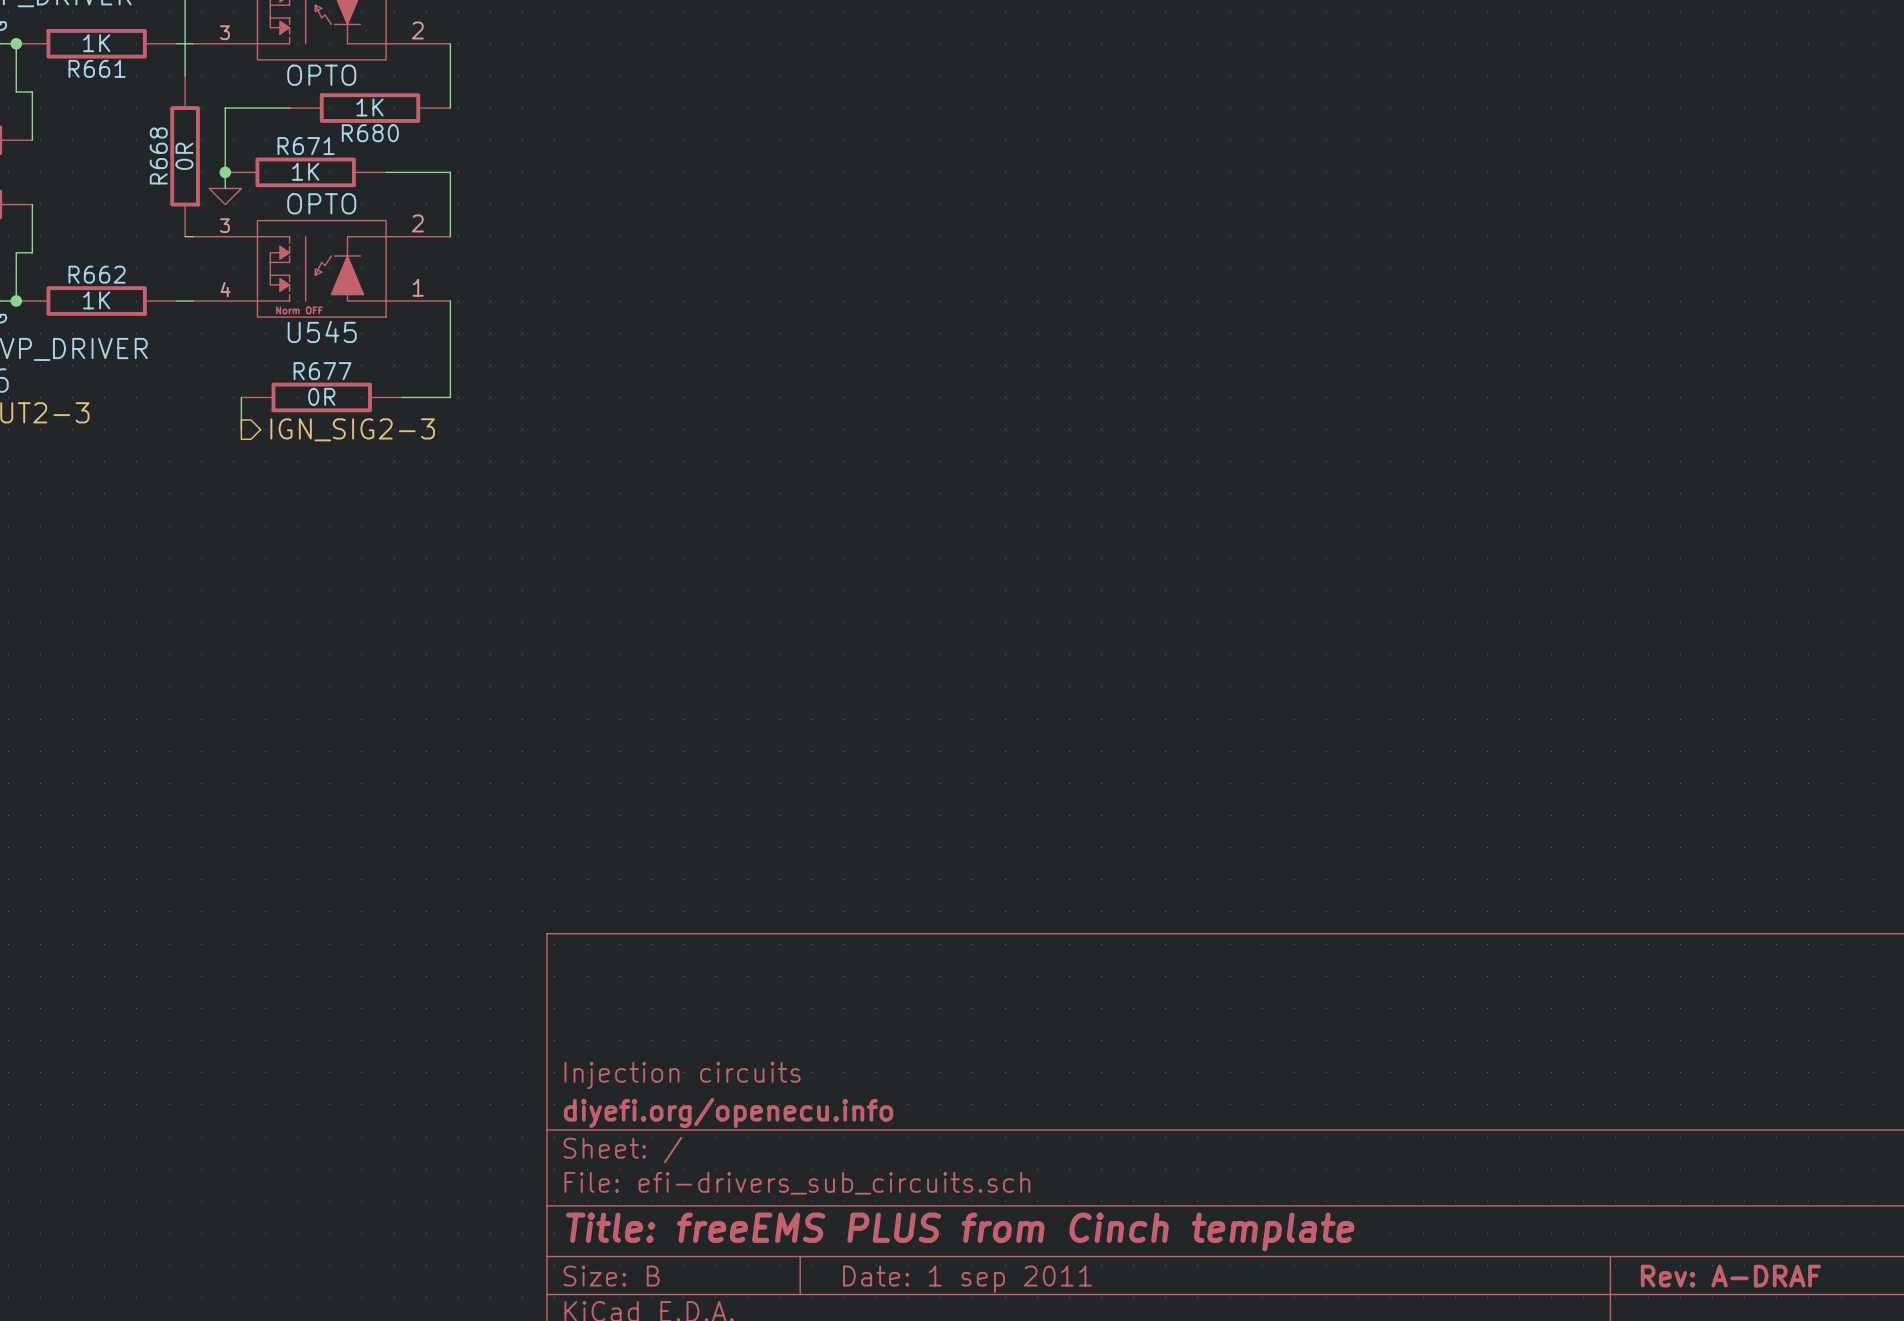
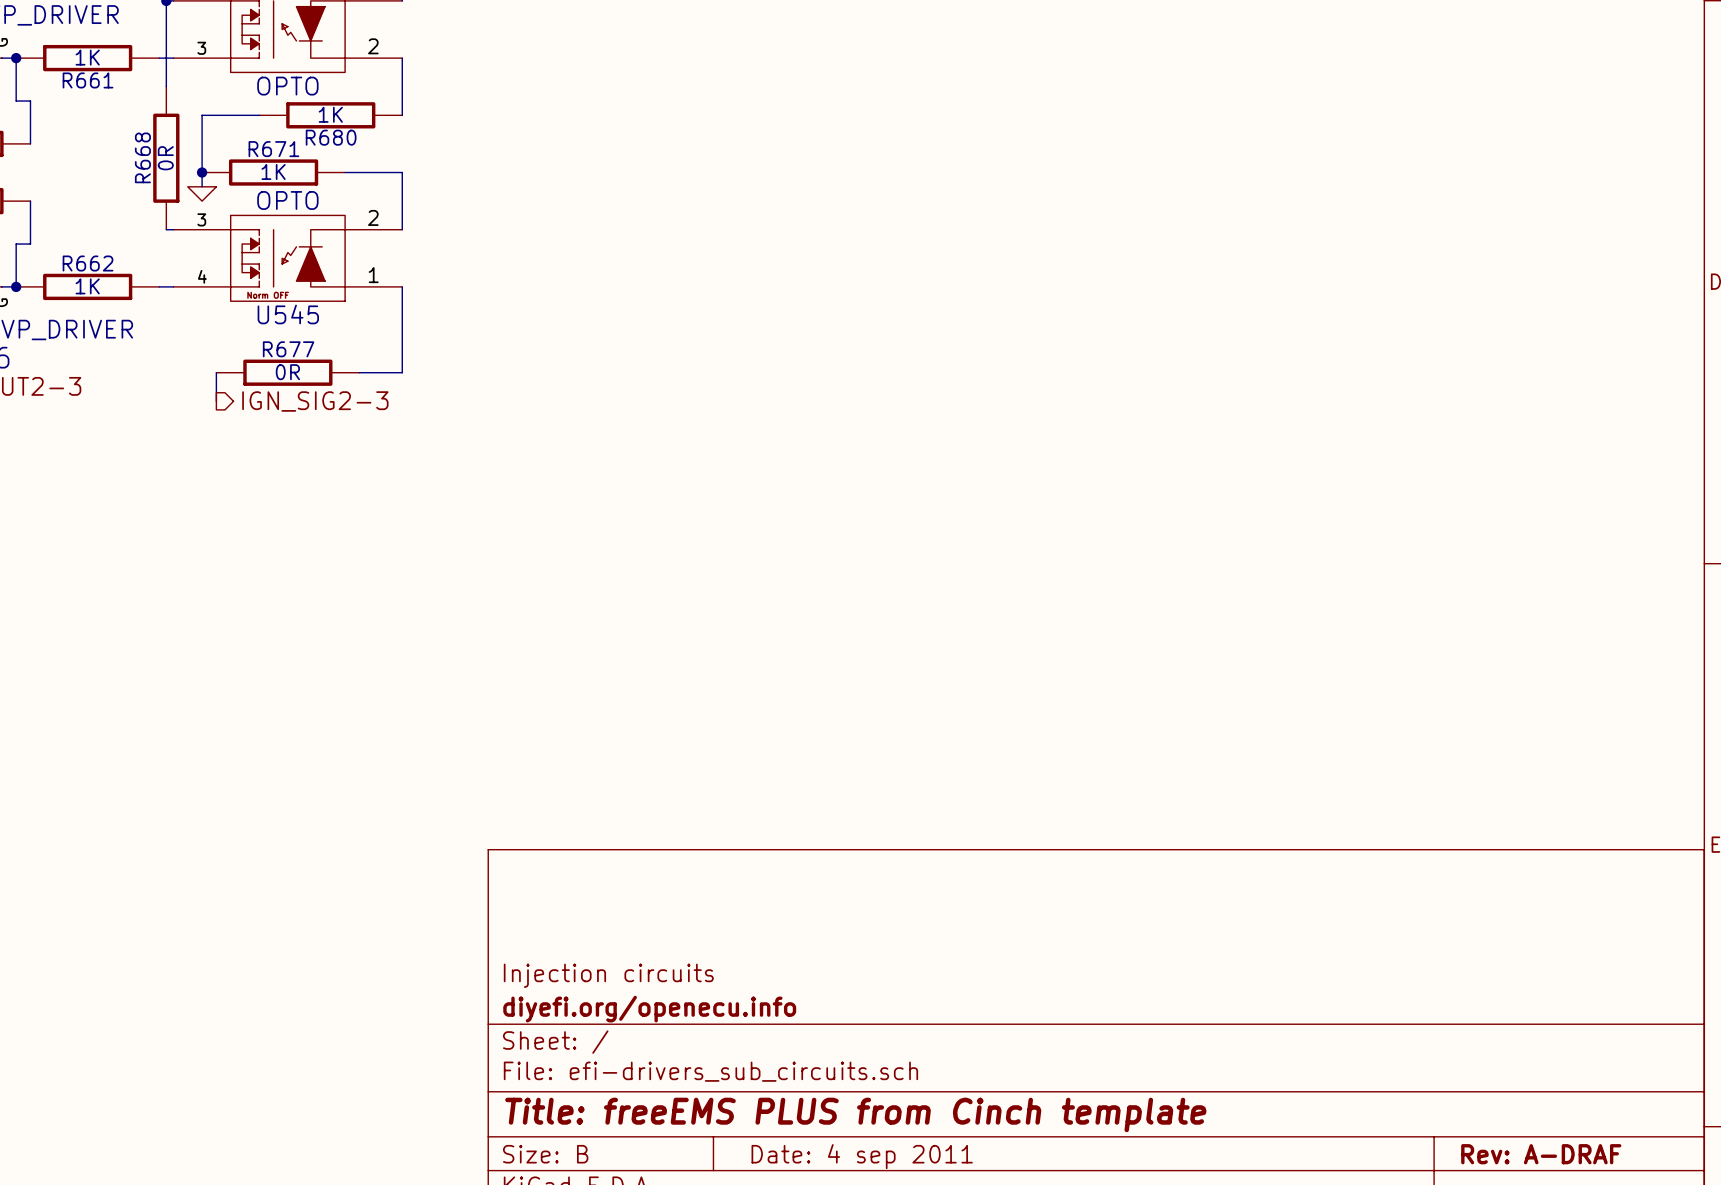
title block: Date: 1 sep 2011 (967, 1279) -> Date: 4 sep 2011 (862, 1156)

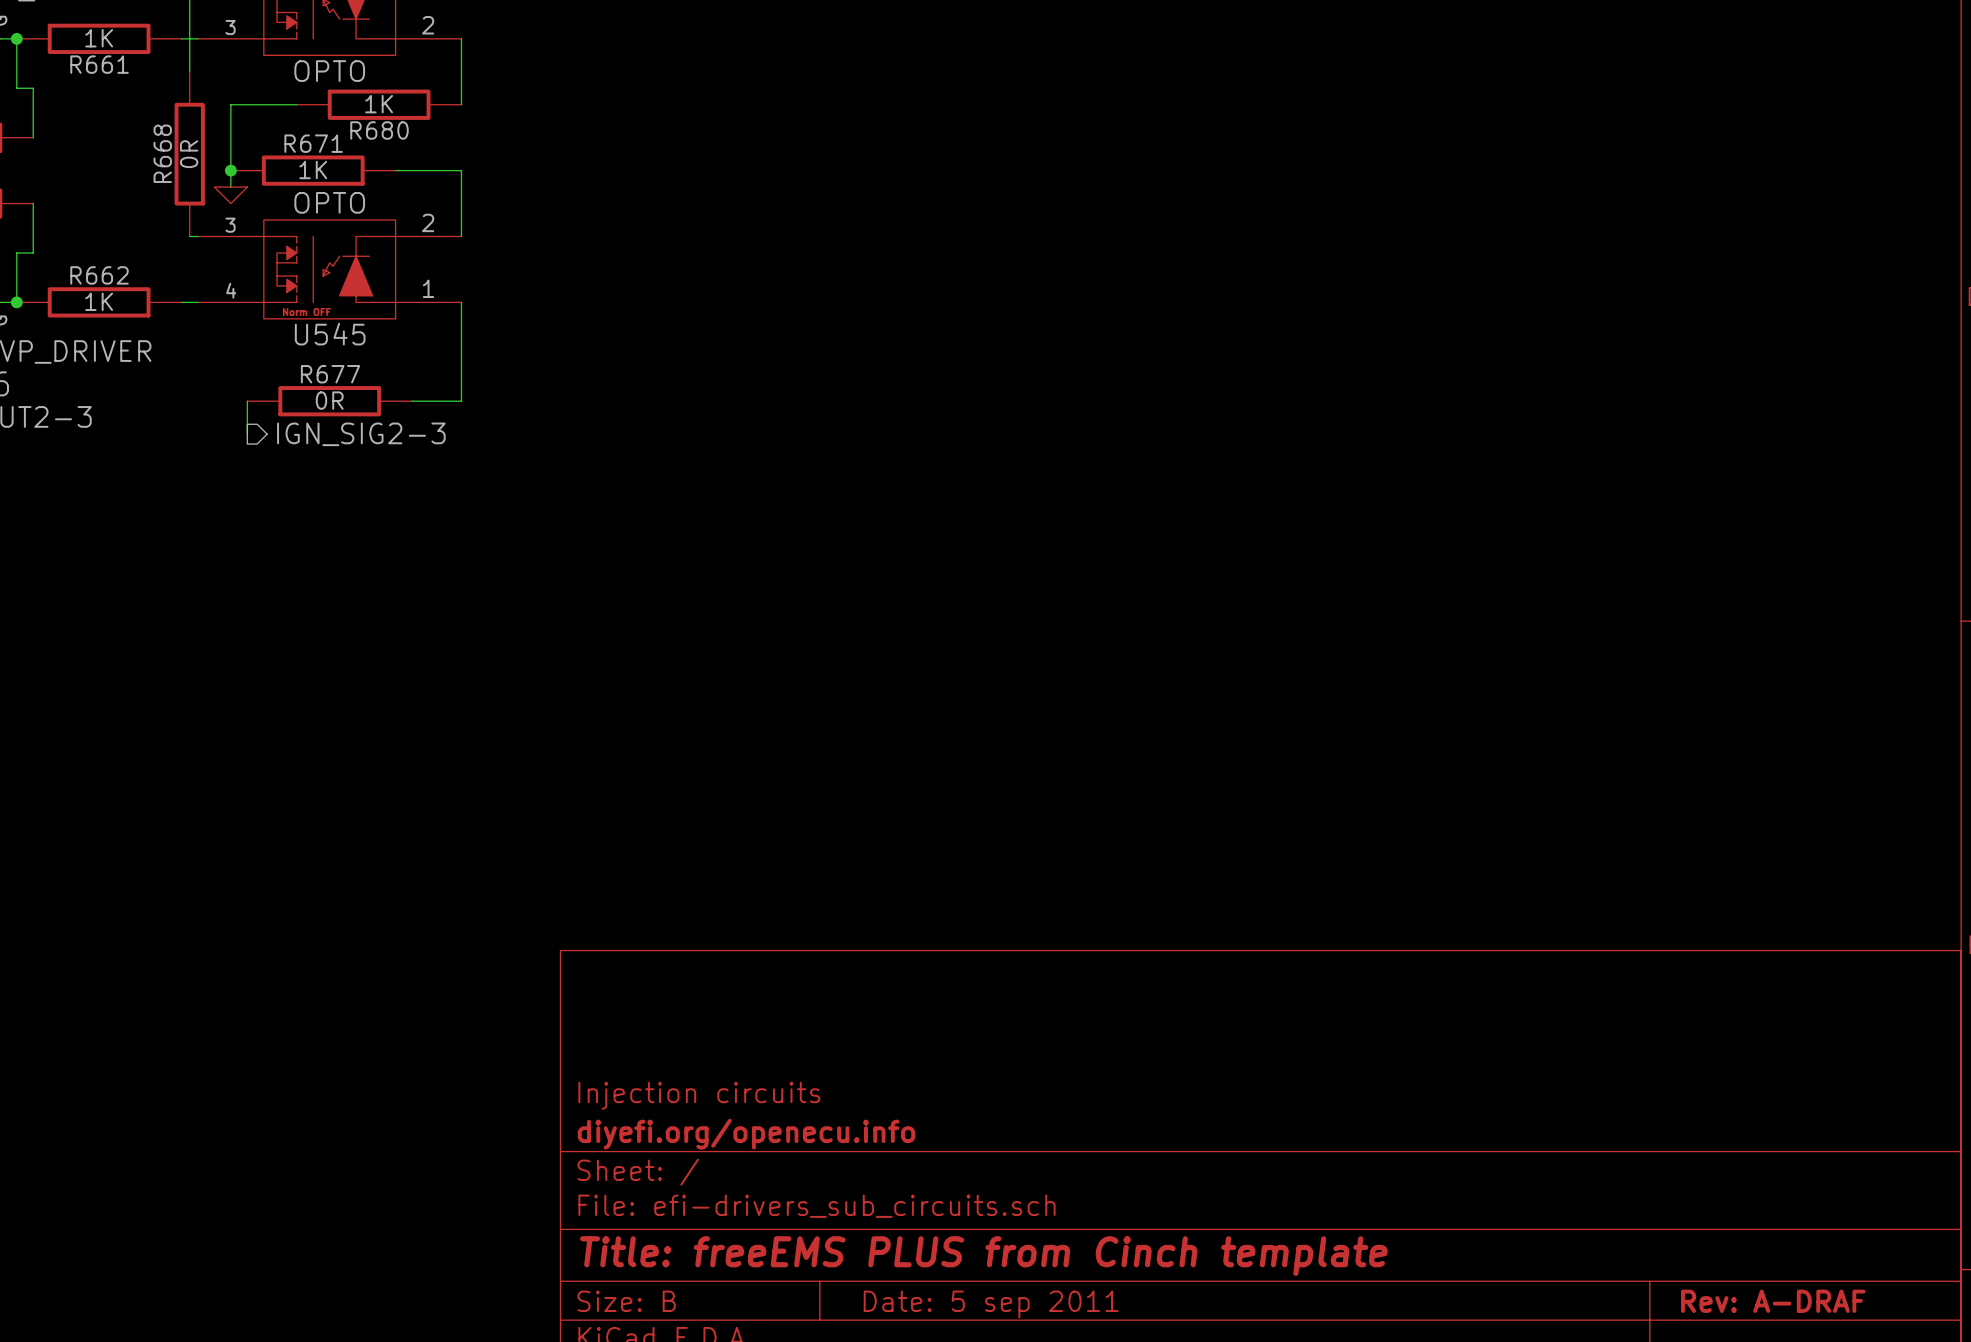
title block: Date: 4 sep 2011 (862, 1156) -> Date: 5 sep 2011 (991, 1304)

